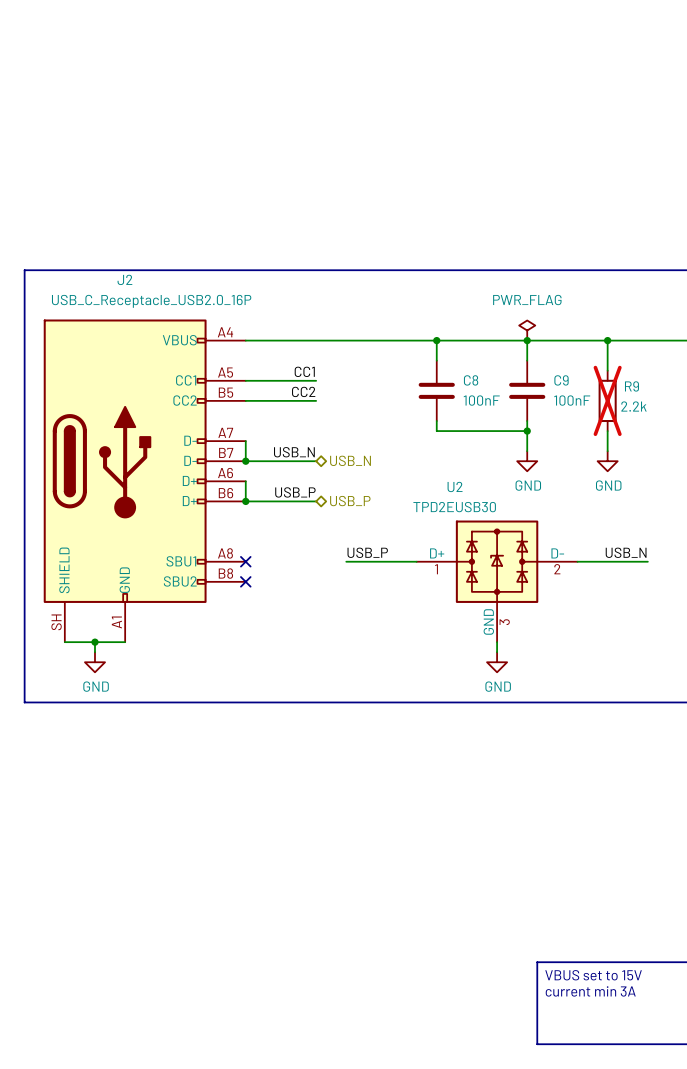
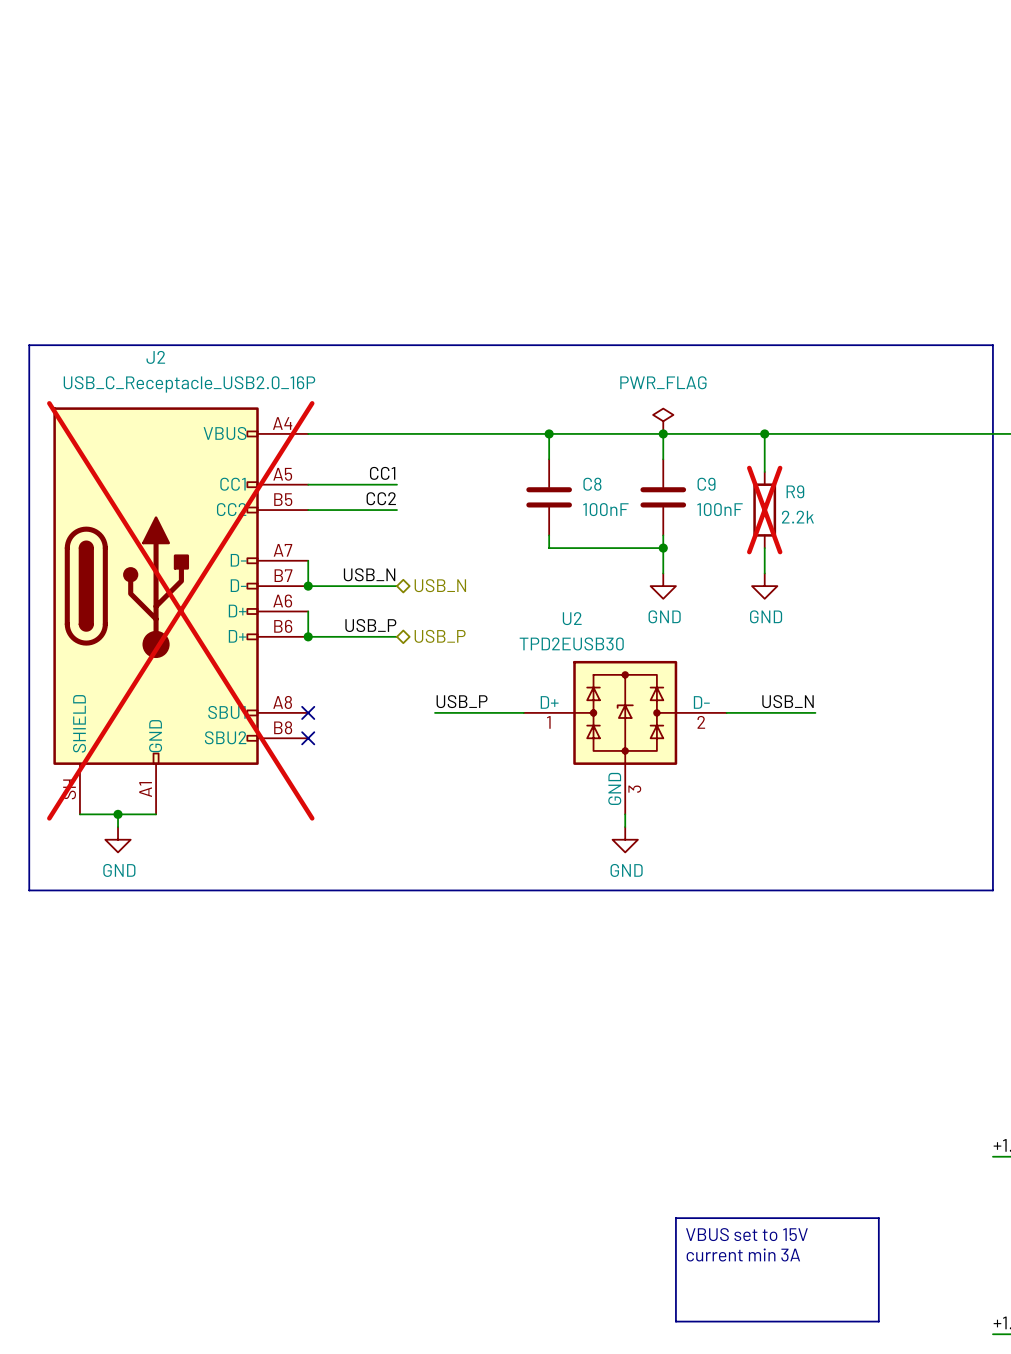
J2 do-not-place cross: none -> (180, 610)

